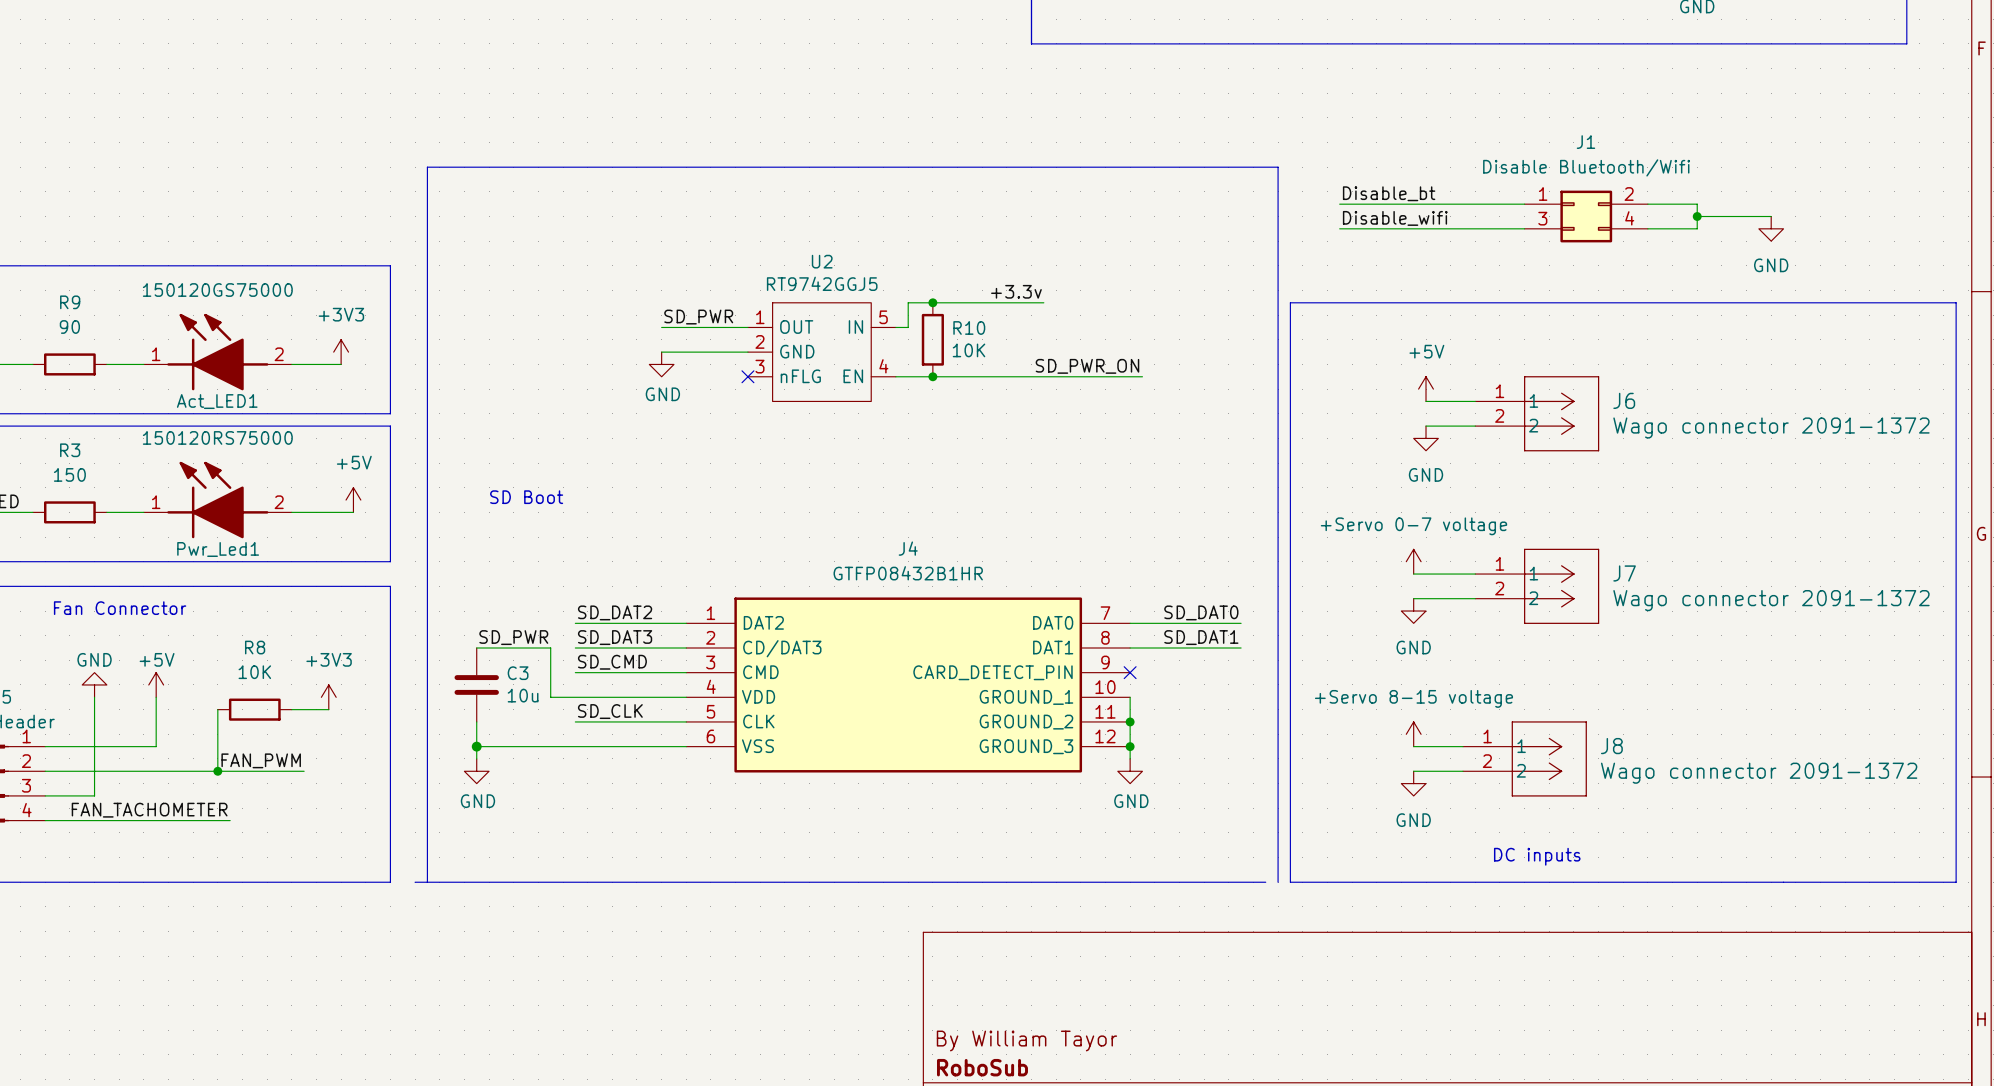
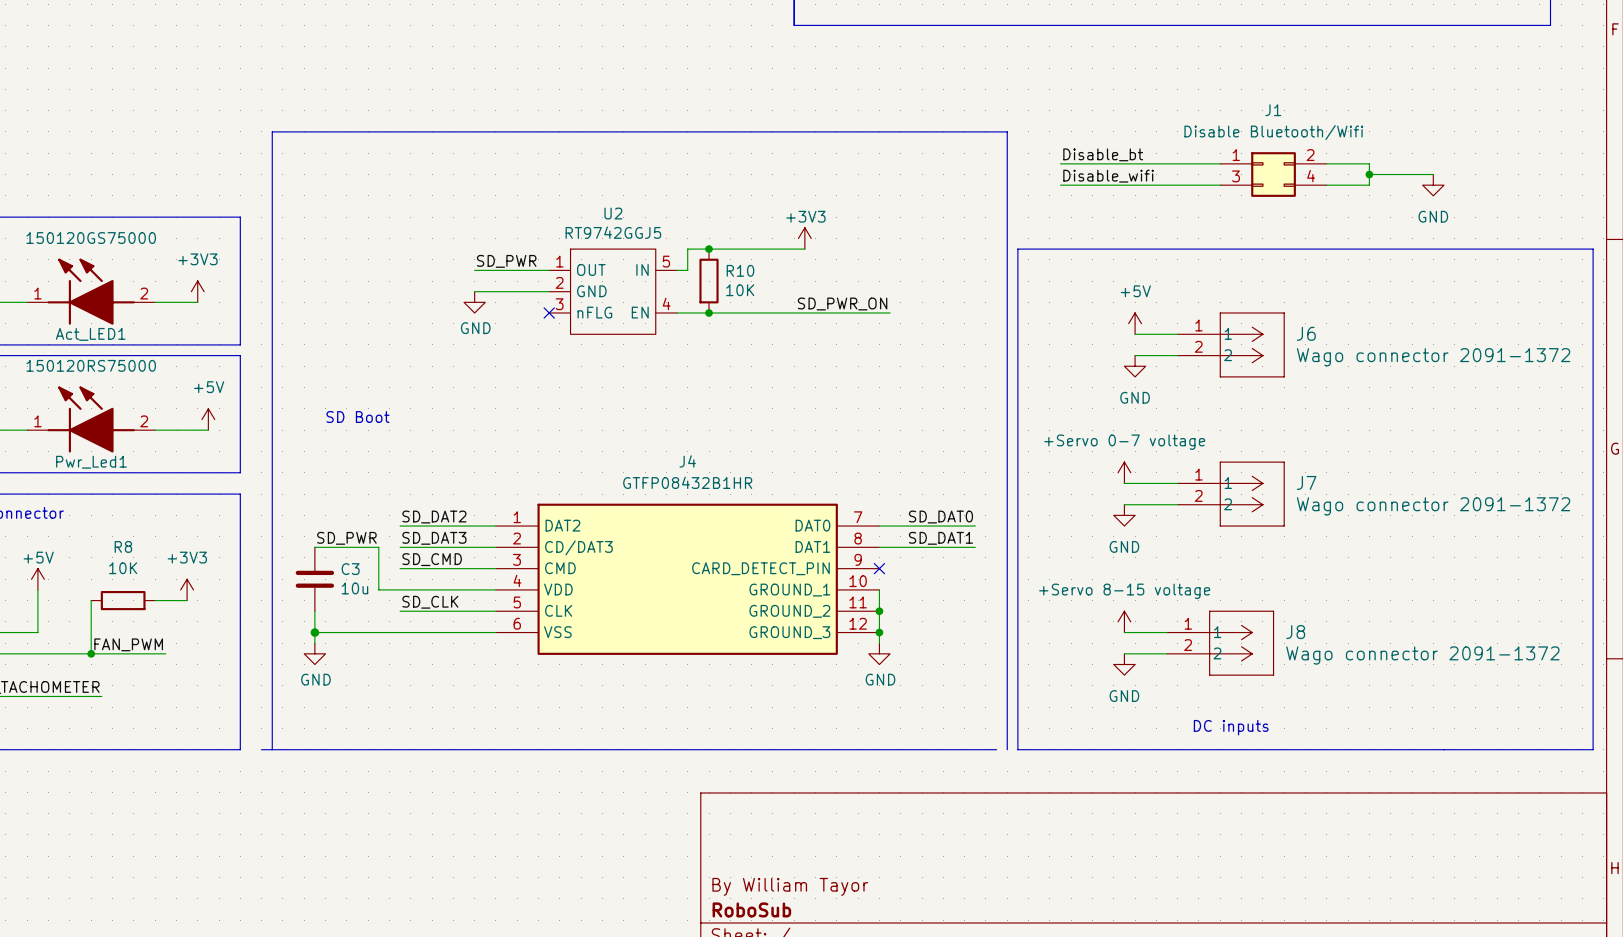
power symbol: none -> +3V3 (804, 238)
label: +3.3v (1016, 291) -> none

